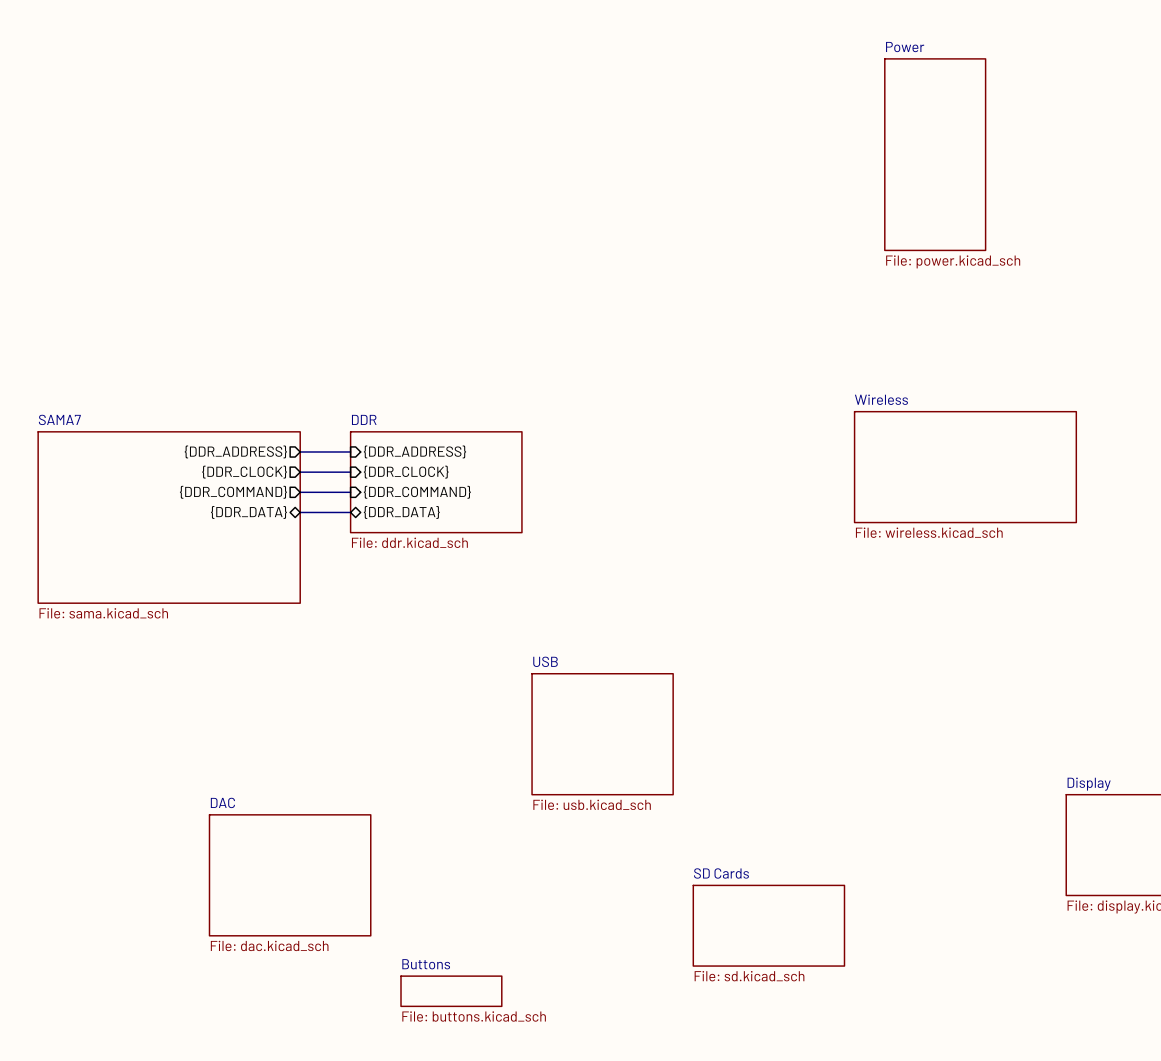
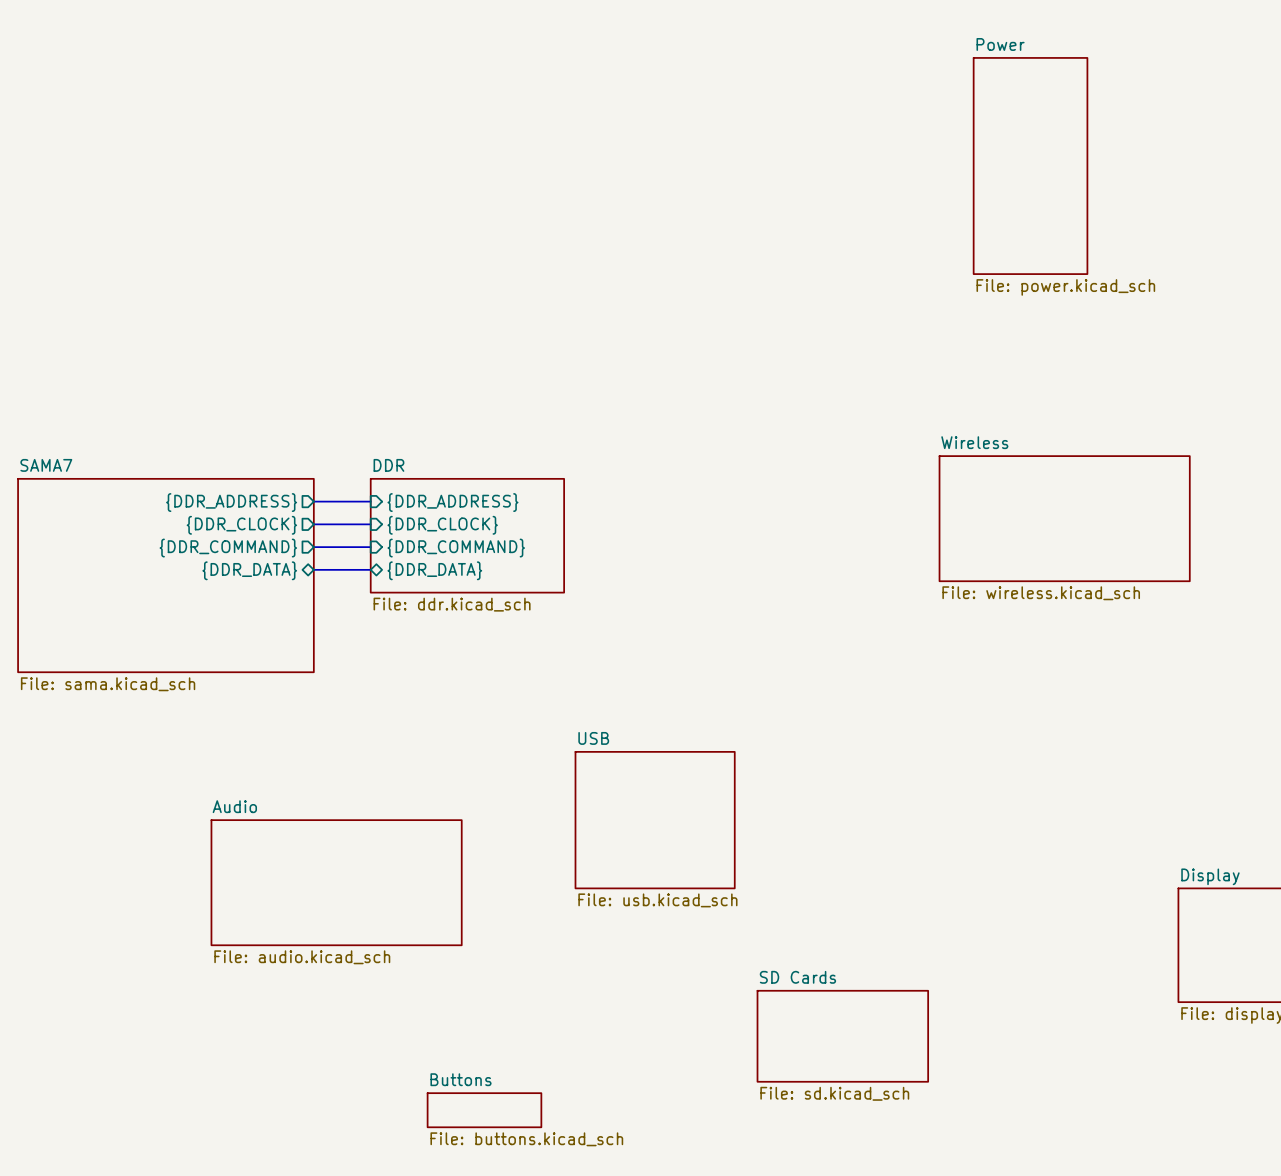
sheet Audio: none -> File: audio.kicad_sch (336, 882)
sheet DAC: File: dac.kicad_sch (290, 875) -> none

